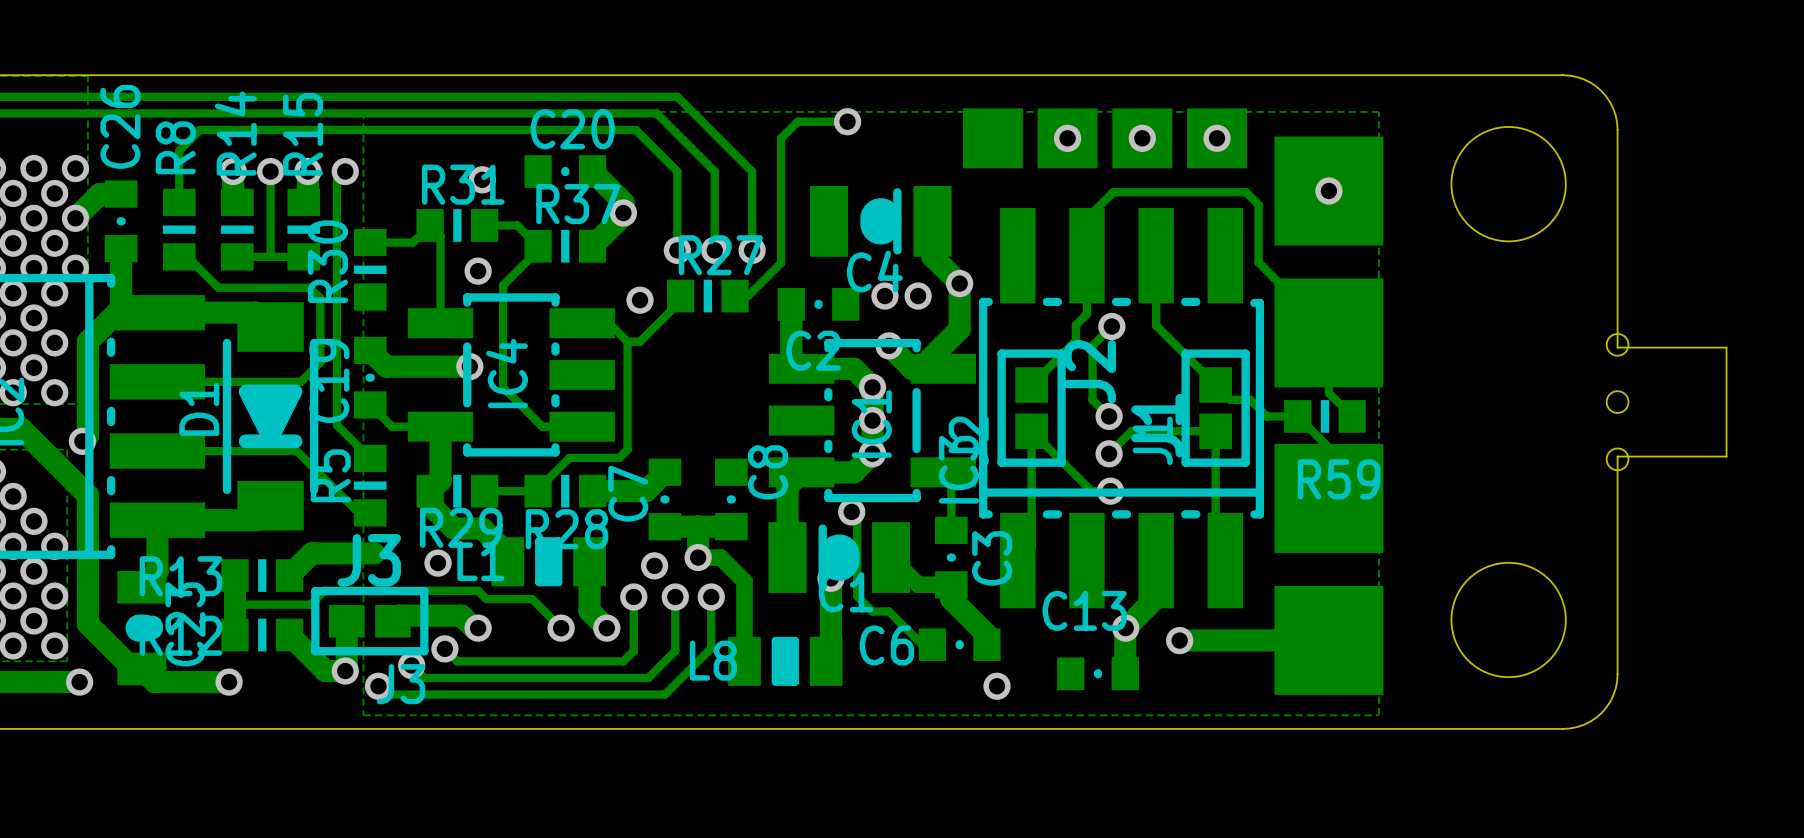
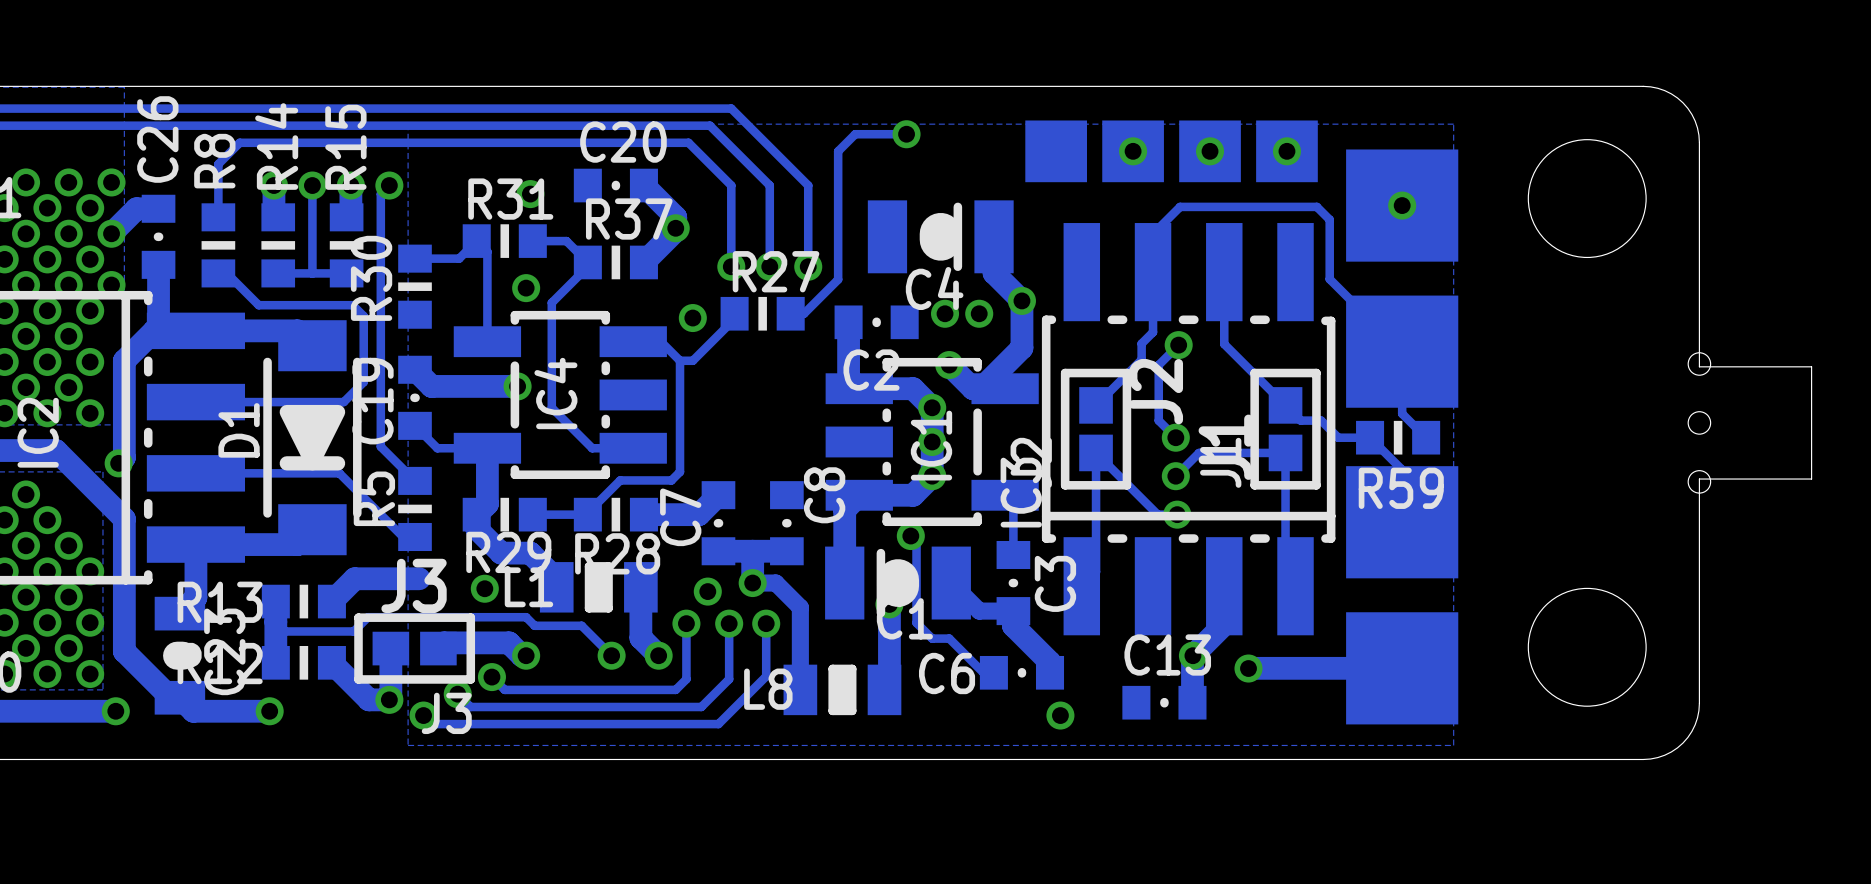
R59 name position: R59 (1339, 479) -> R59 (1401, 488)
C13 name position: C13 (1084, 610) -> C13 (1167, 654)

